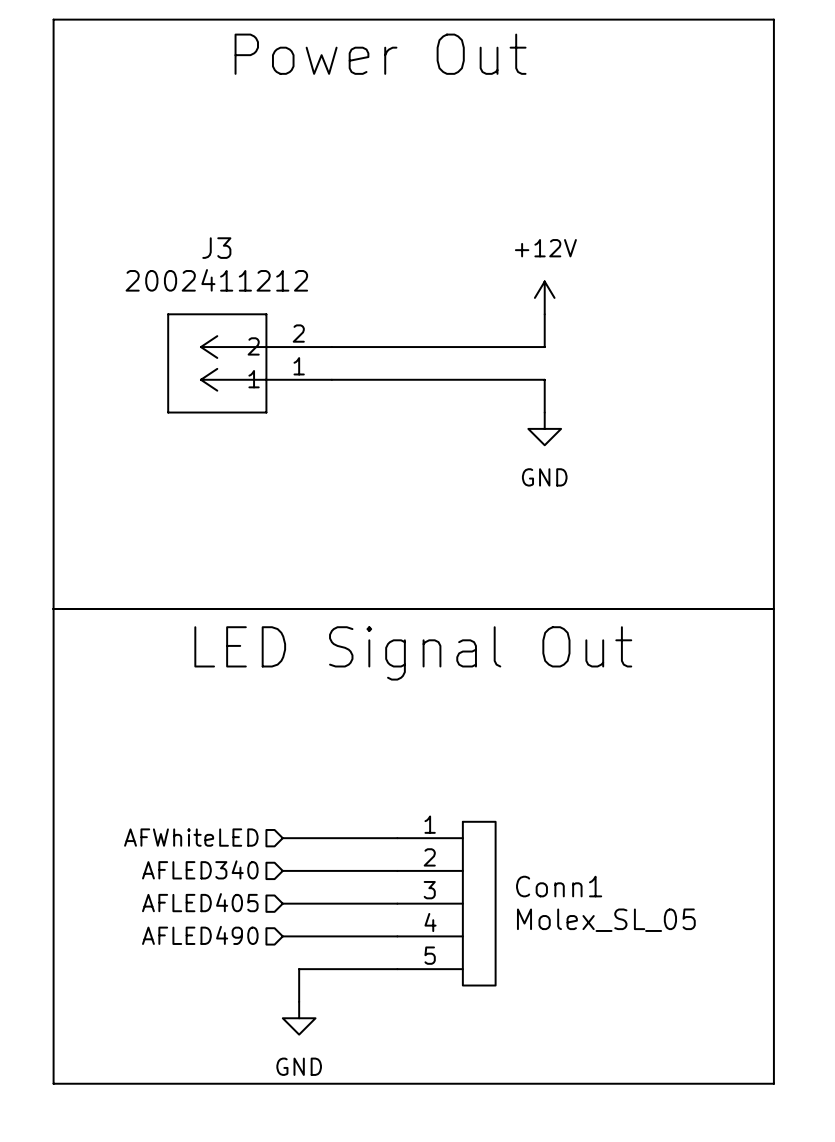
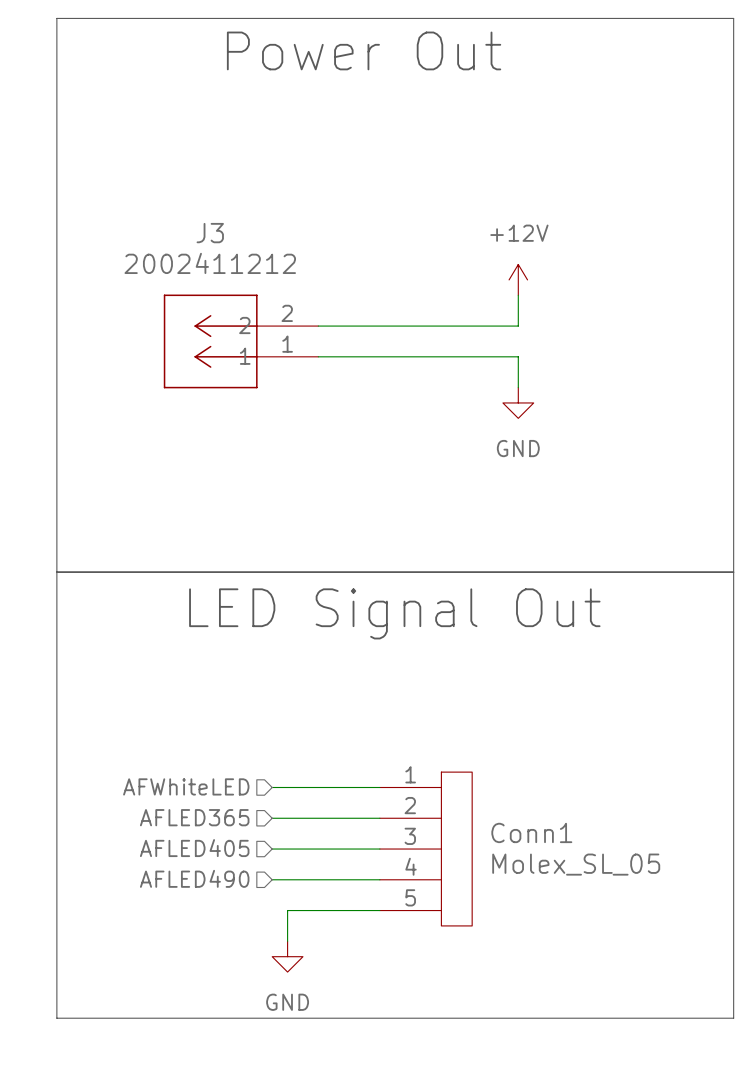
hierarchical label: AFLED340 (200, 869) -> AFLED365 (194, 817)

